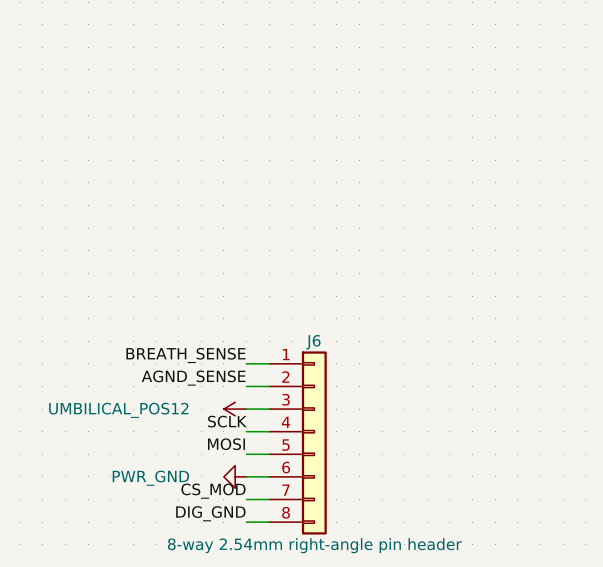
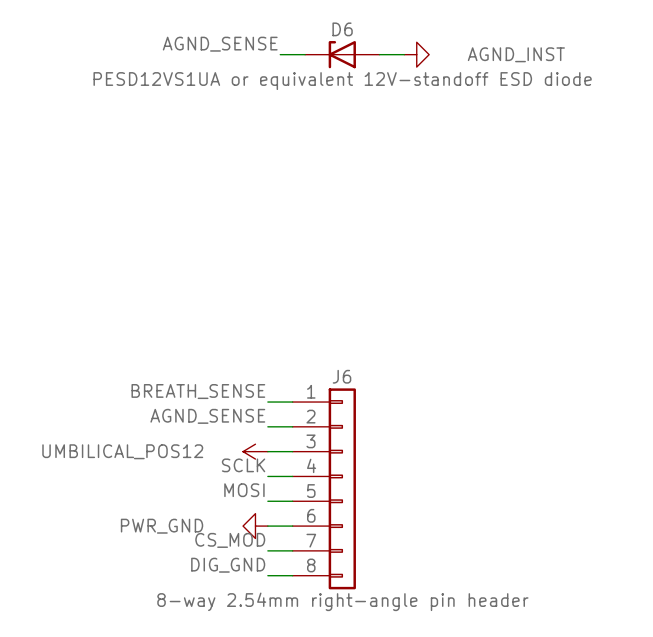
label: none -> AGND_SENSE (220, 44)
wire: none -> (280, 54) (305, 54)
D6: none -> PESD12VS1UA or equivalent 12V-standoff ESD diode (342, 54)
wire: none -> (379, 54) (404, 54)
power symbol: none -> AGND_INST (416, 54)

